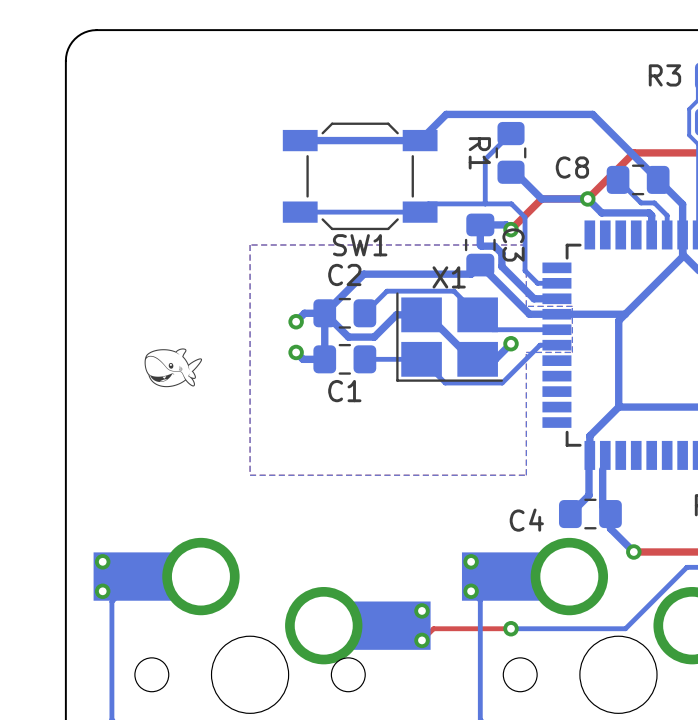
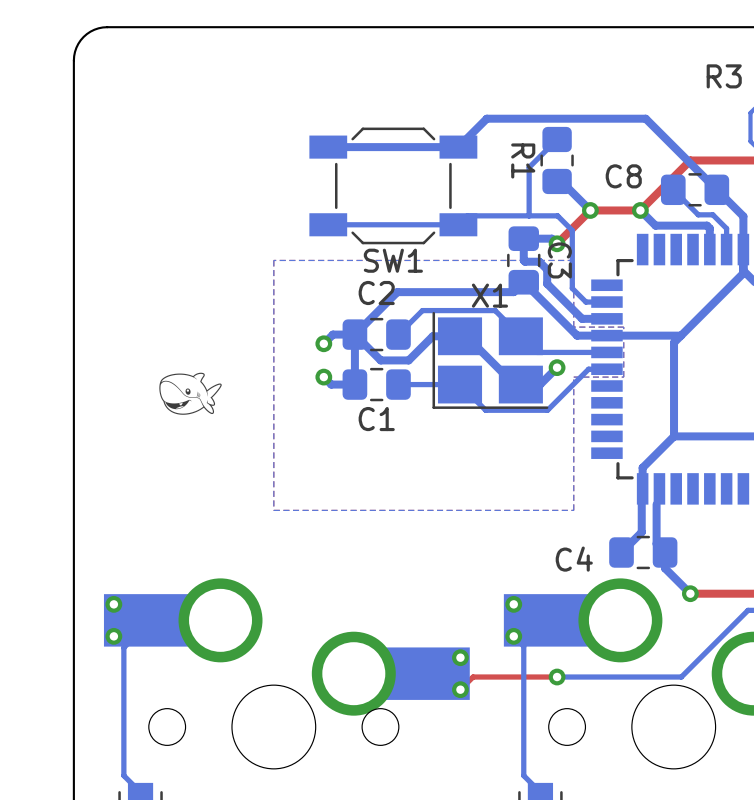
via: none -> (590, 210)
bottom track: (587, 198) (541, 198) -> none

